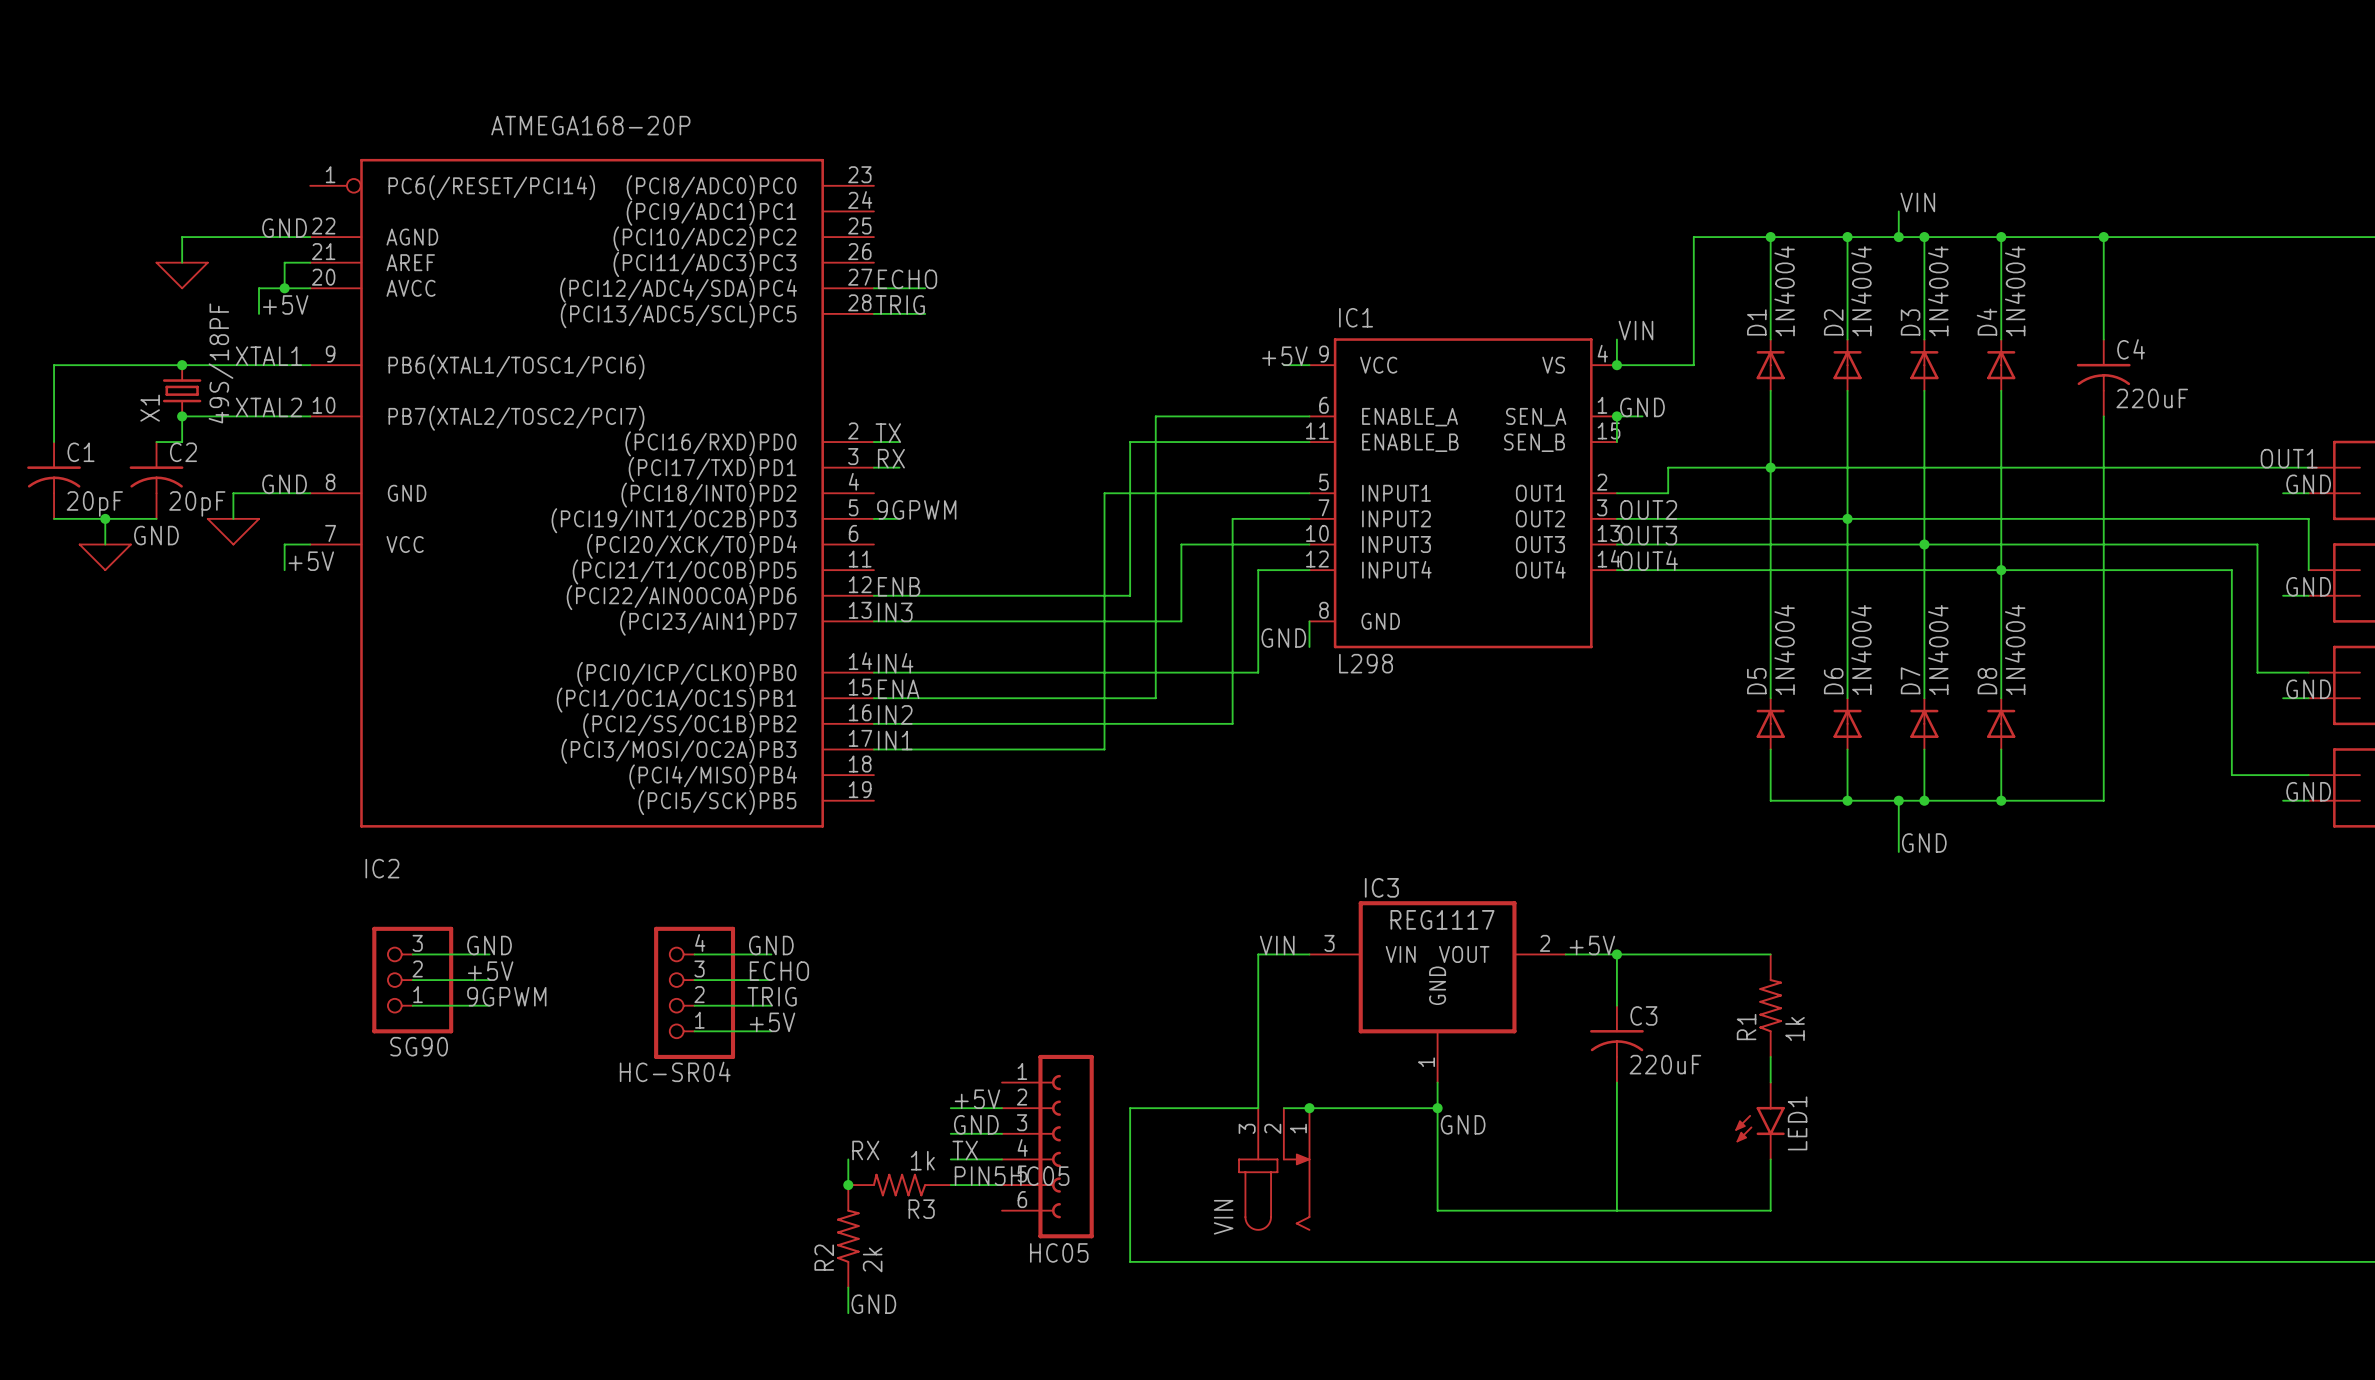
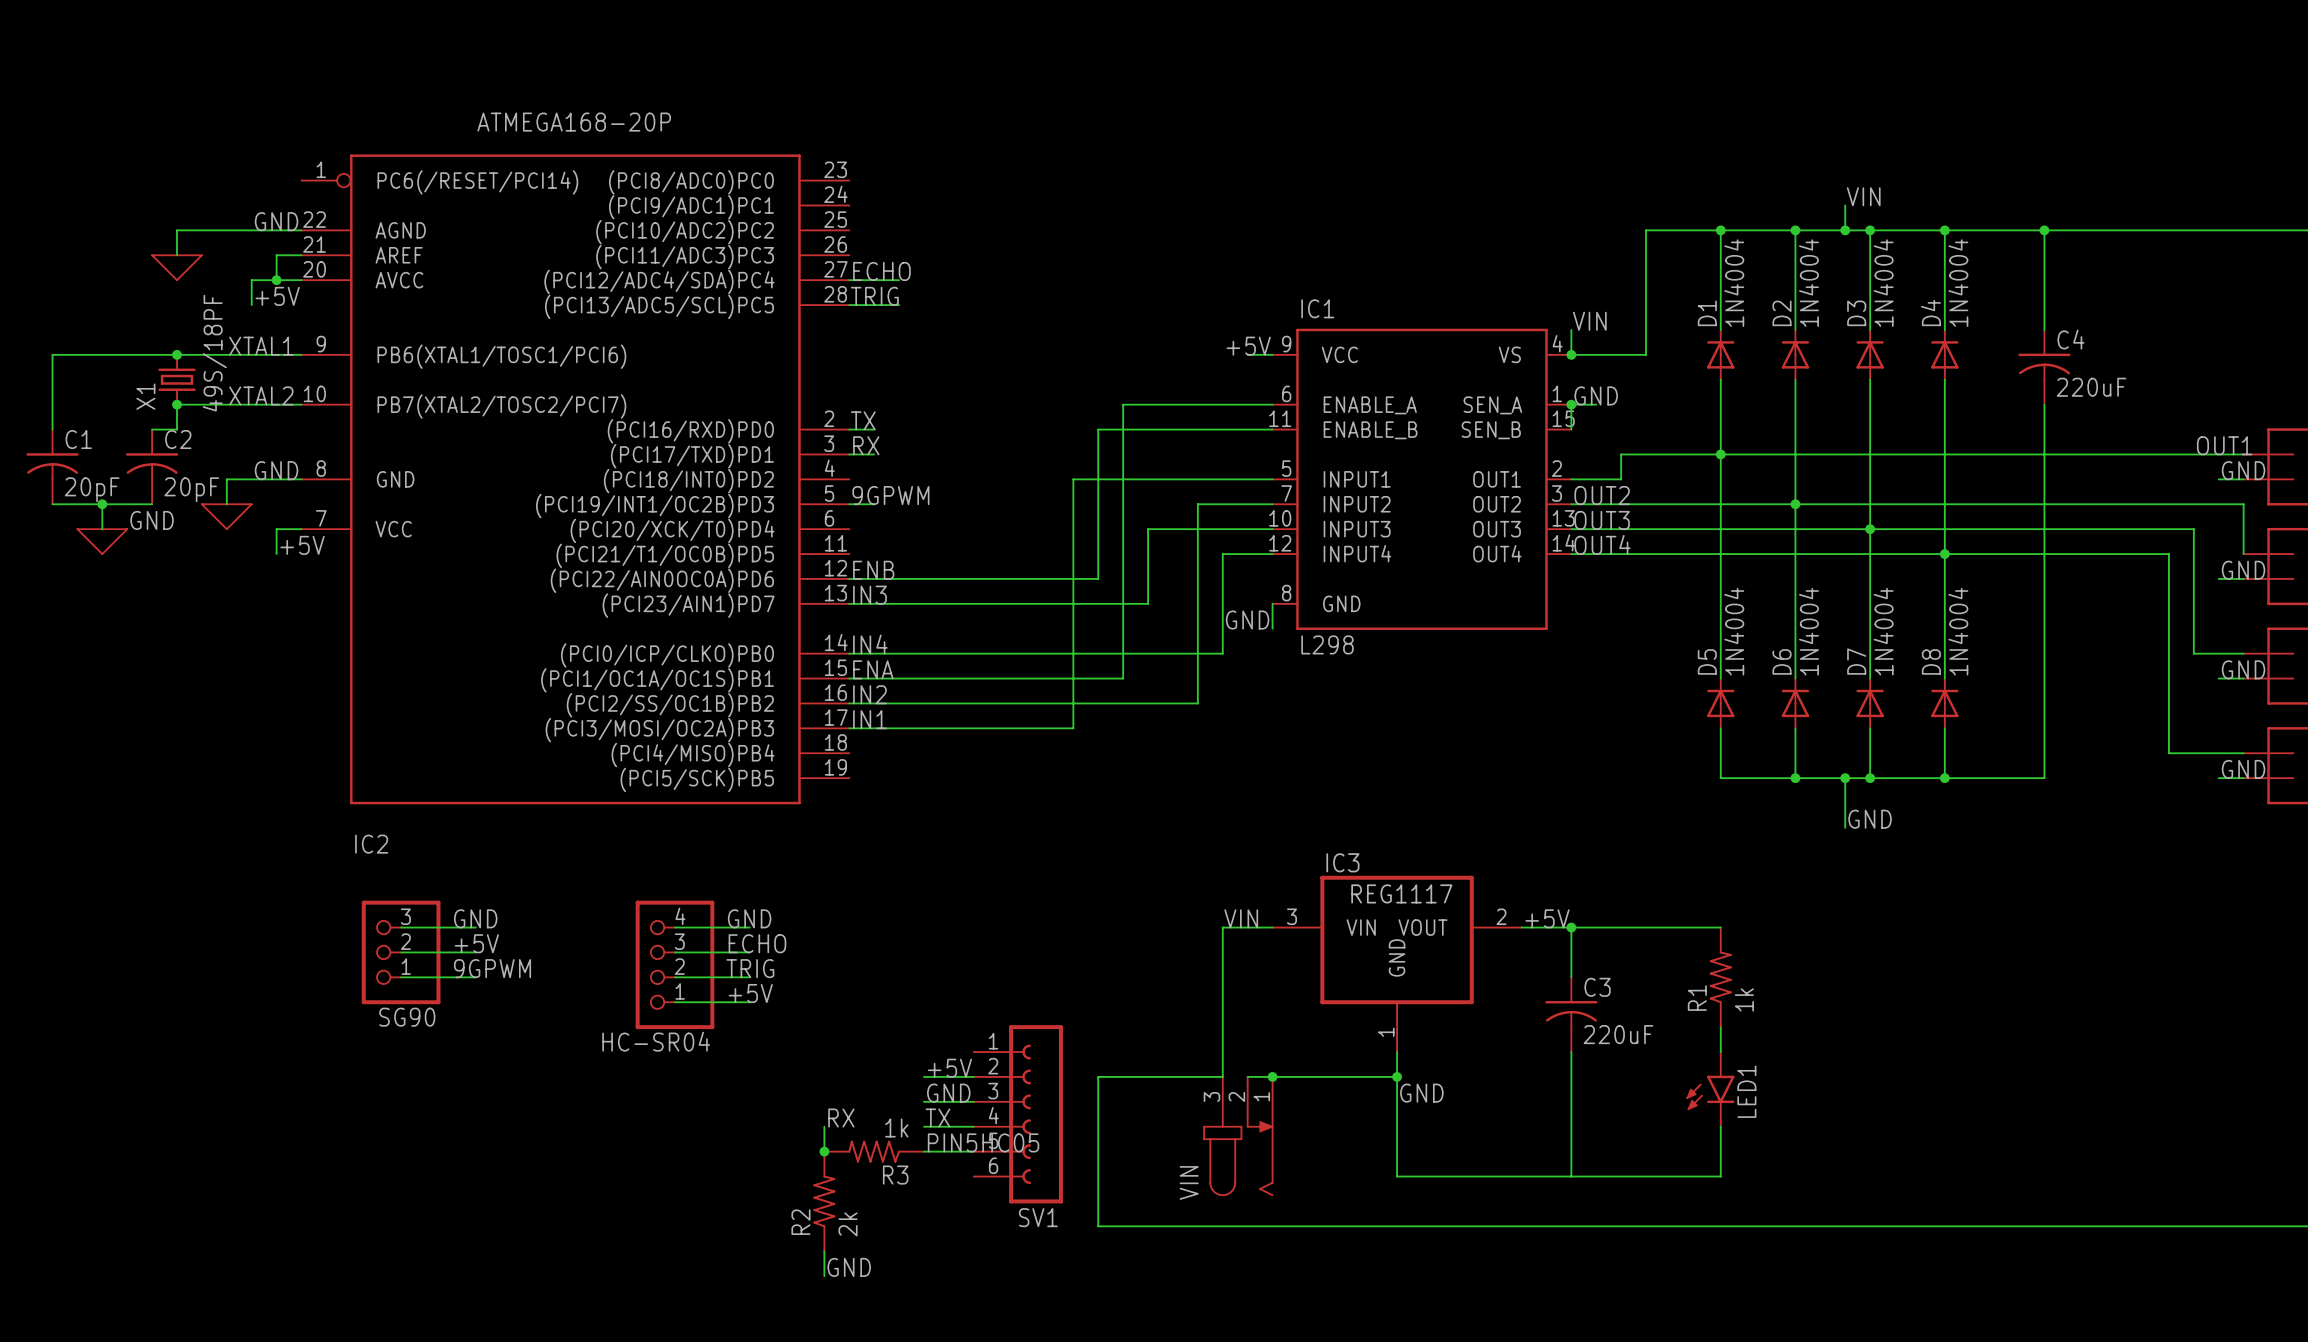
HC05 name: HC05 (1059, 1252) -> SV1 (1038, 1217)

